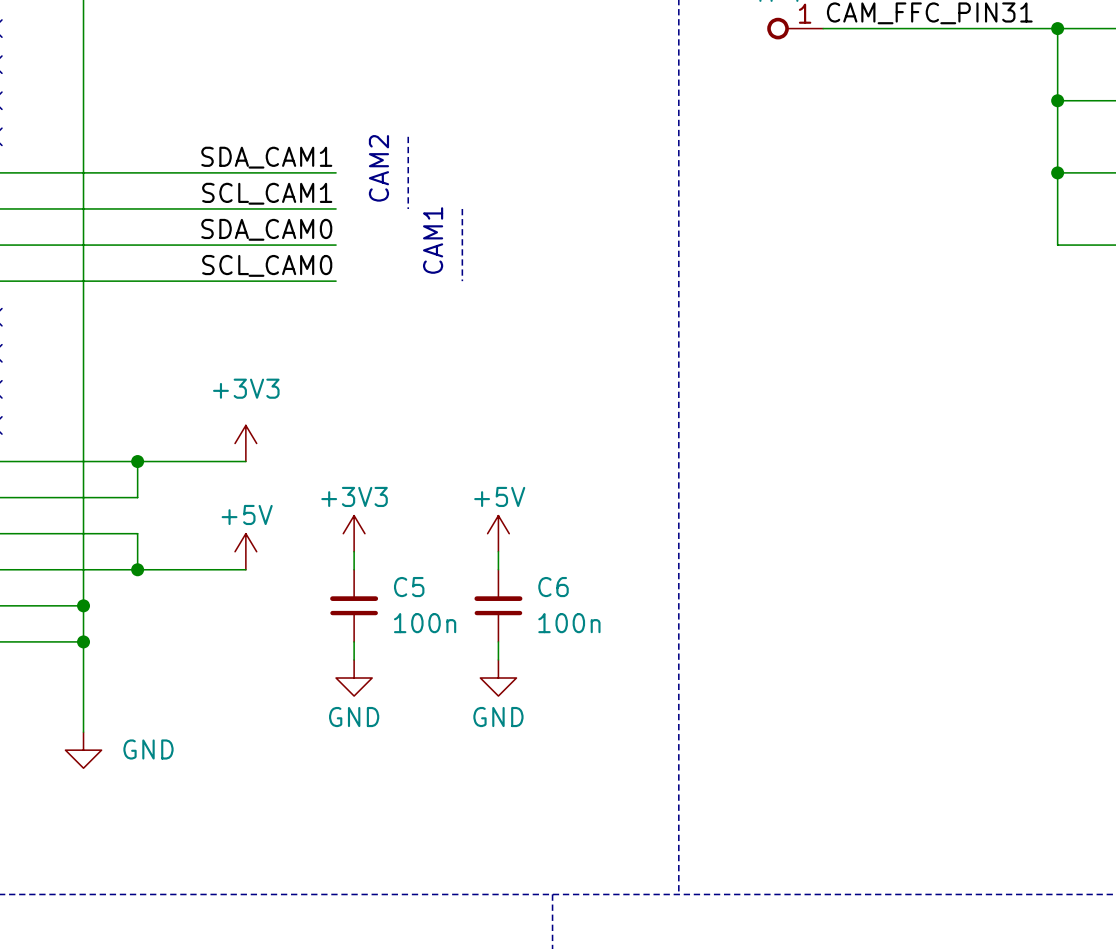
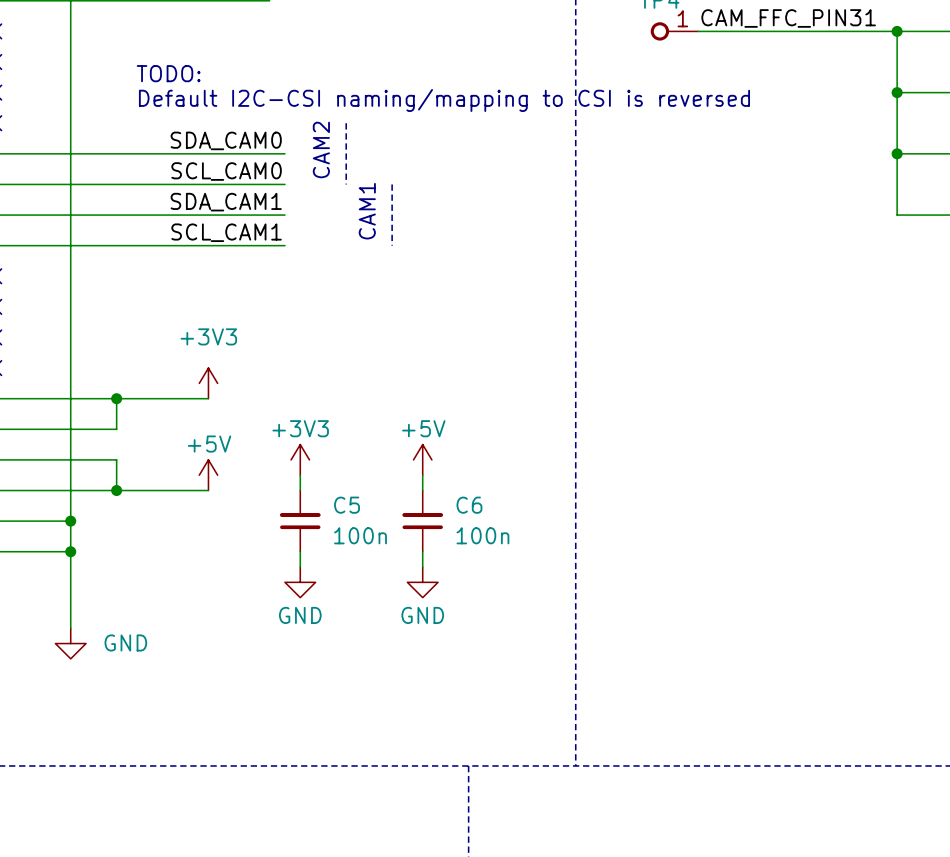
text: none -> TODO: (168, 73)
text: none -> Default I2C-CSI naming/mapping to CSI is reversed (444, 100)
label: SDA_CAM1 (266, 157) -> SDA_CAM0 (226, 140)
label: SCL_CAM1 (267, 193) -> SCL_CAM0 (226, 171)
label: SDA_CAM0 (266, 229) -> SDA_CAM1 (226, 202)
label: SCL_CAM0 (267, 265) -> SCL_CAM1 (226, 232)

